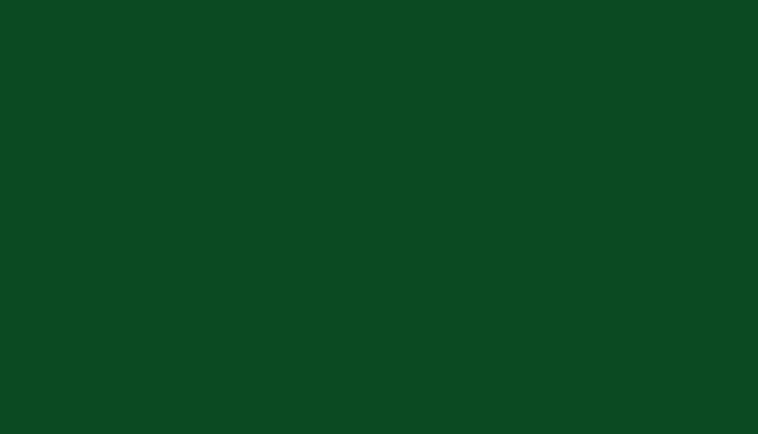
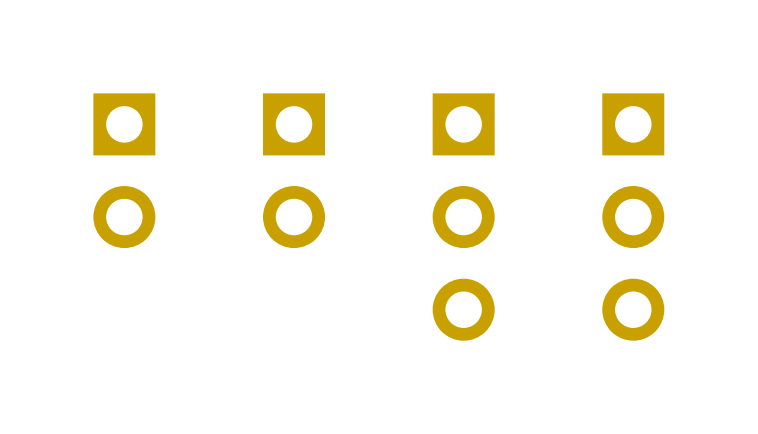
part: none -> (124, 170)
part: none -> (294, 170)
part: none -> (463, 217)
part: none -> (633, 217)

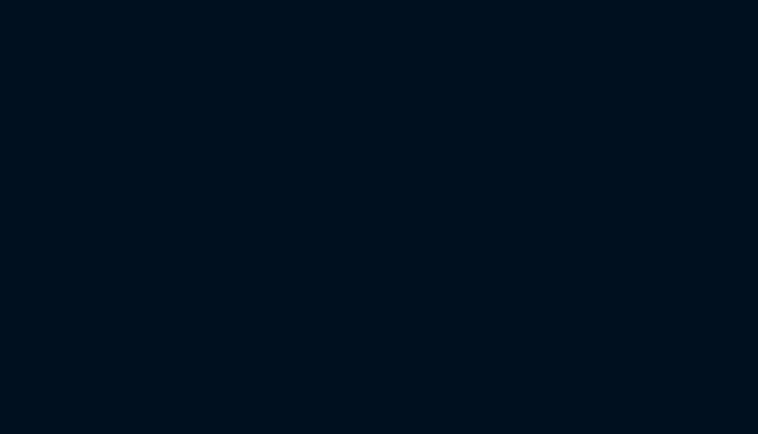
part: (124, 170) -> none
part: (294, 170) -> none
part: (463, 217) -> none
part: (633, 217) -> none

